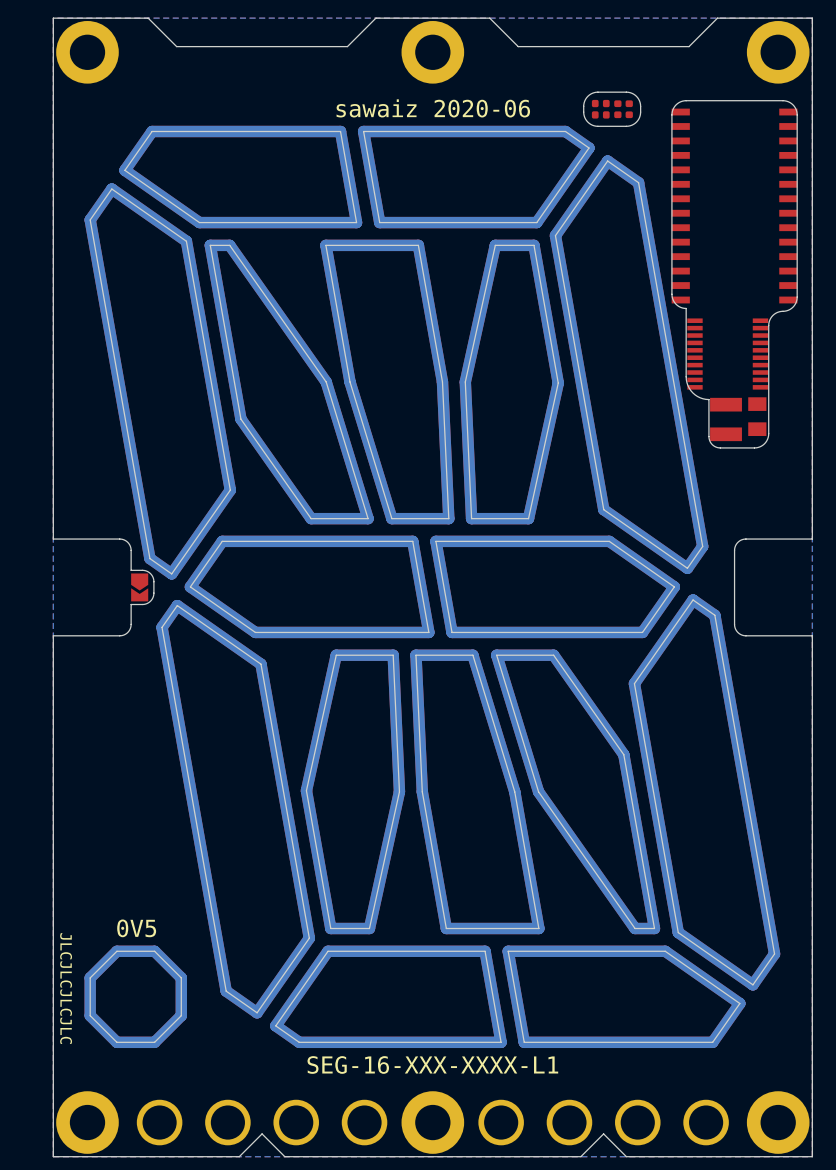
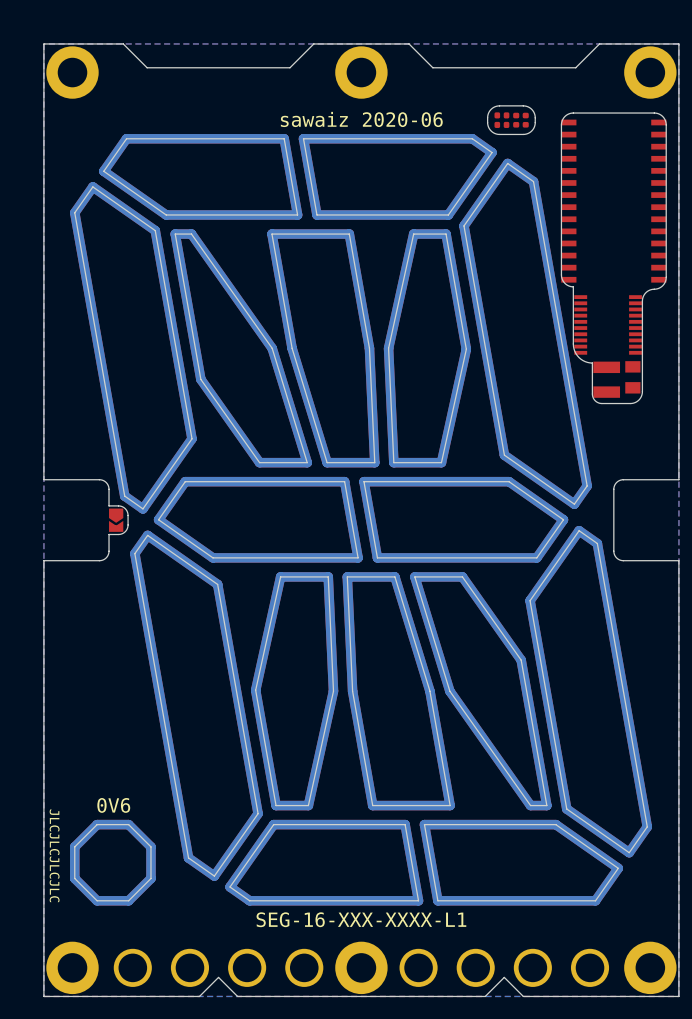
text: 0V5 (136, 928) -> 0V6 (113, 805)

